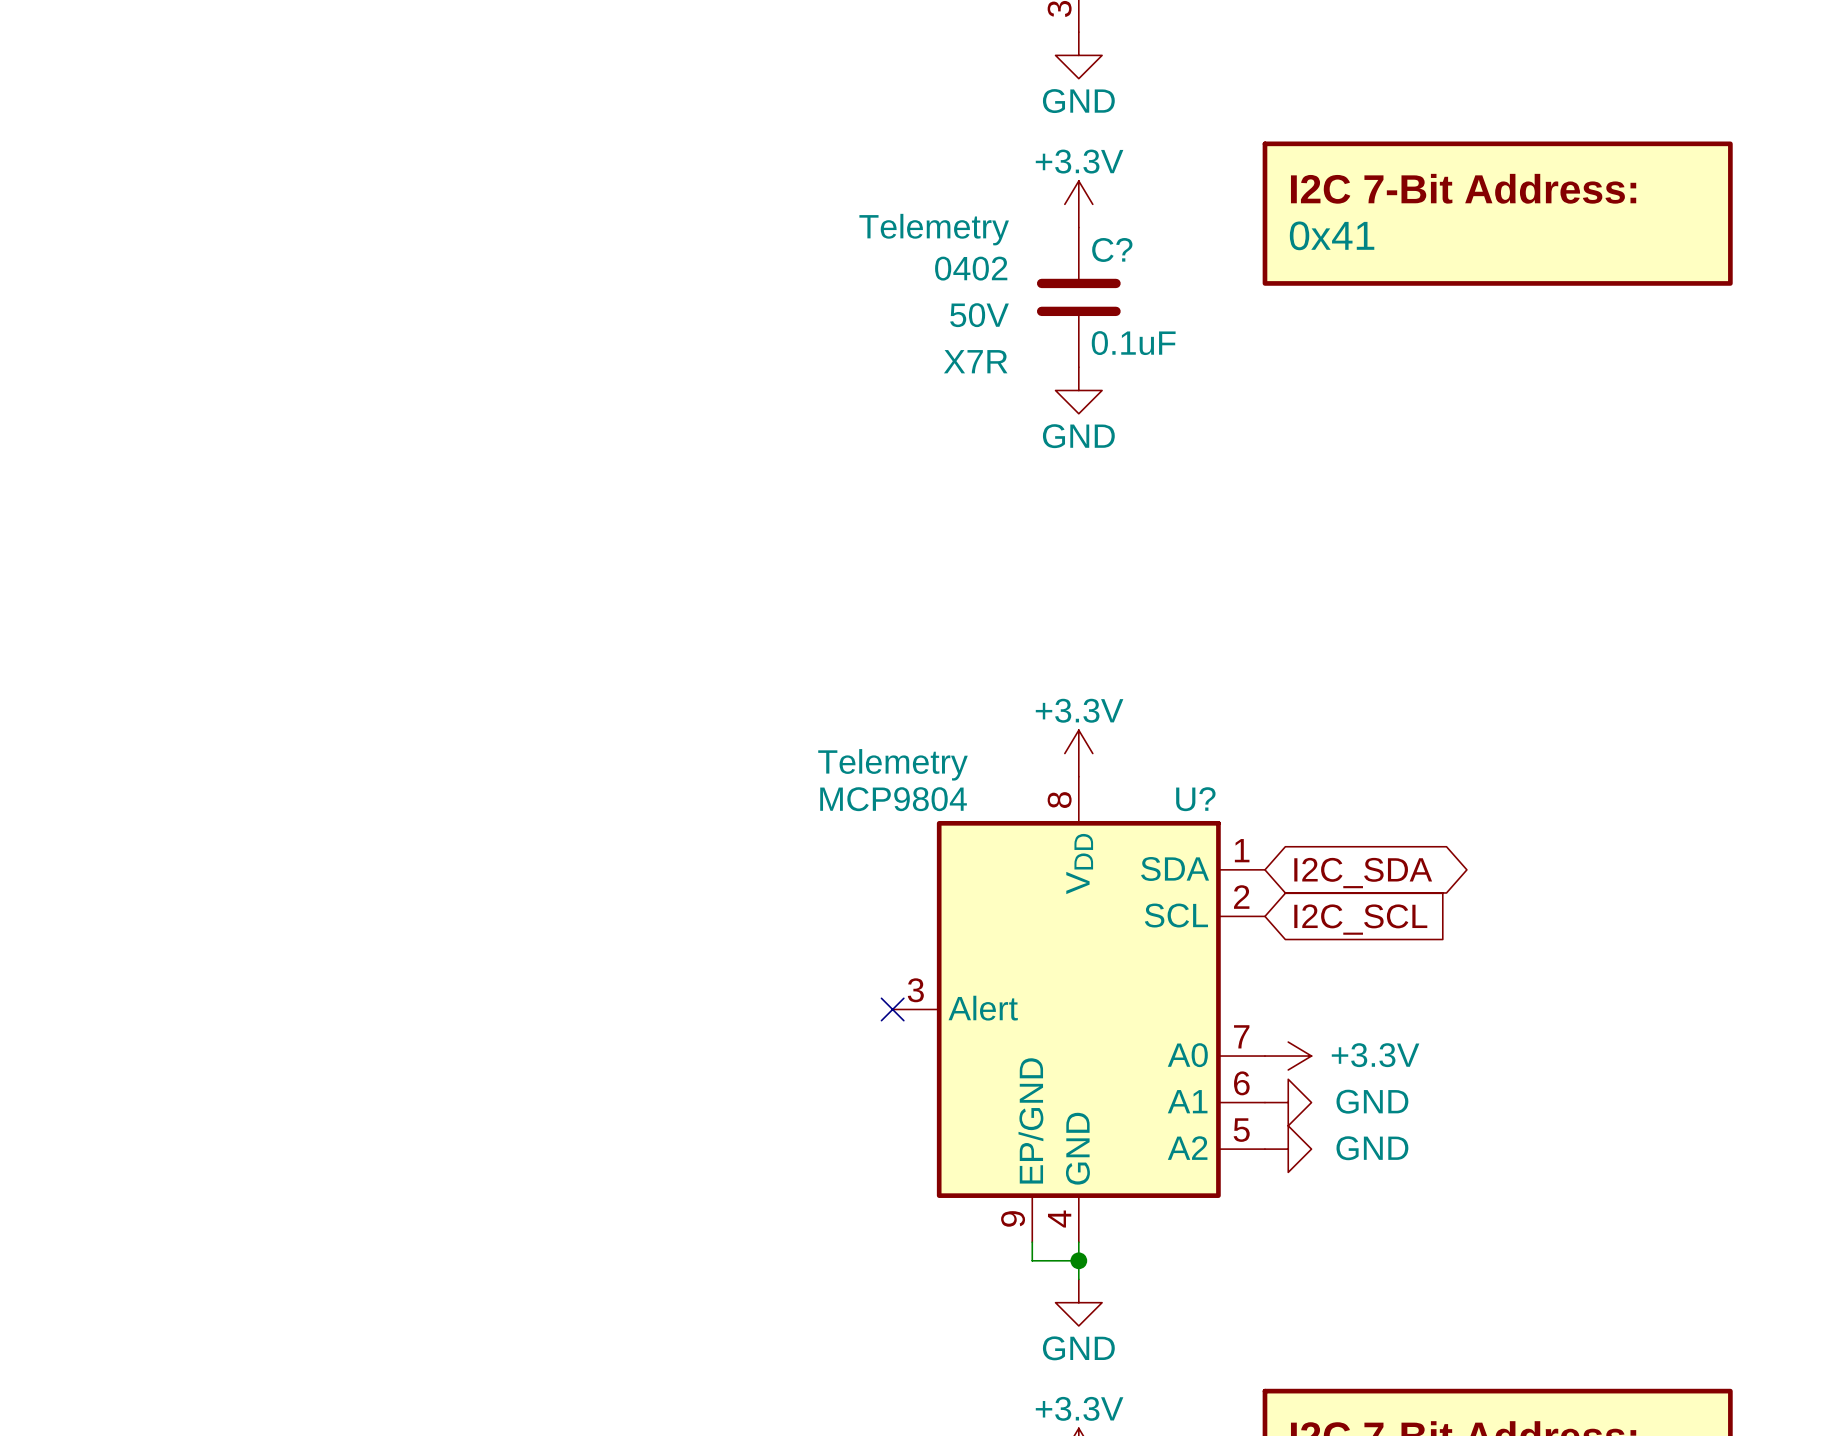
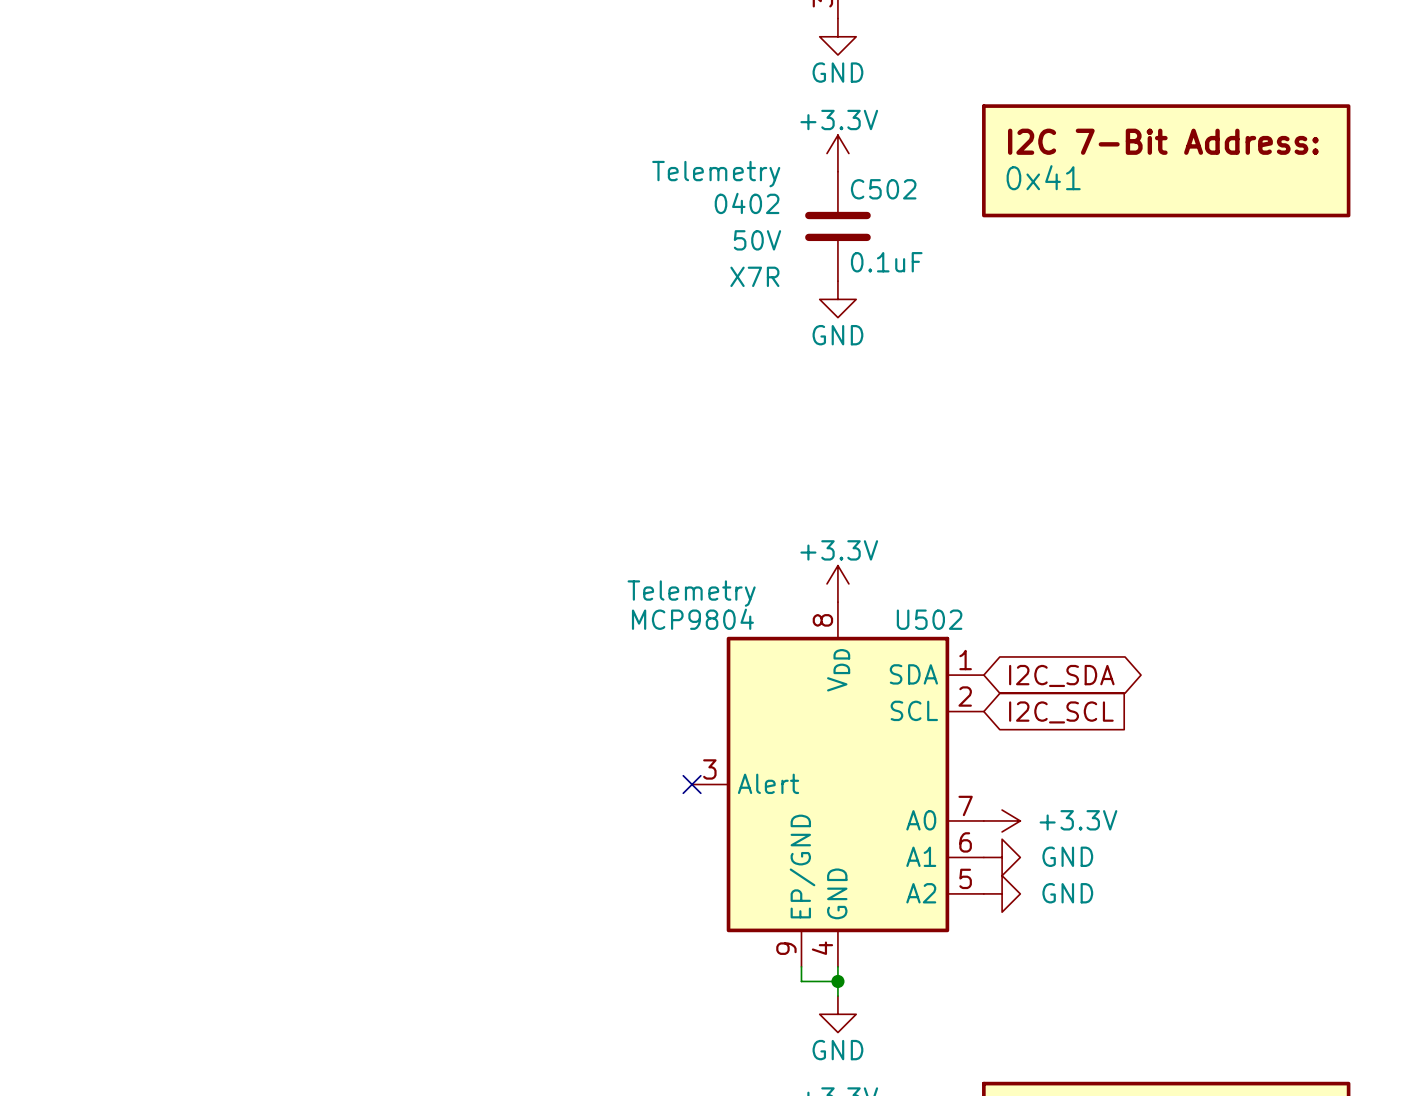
C? name: C? (1112, 249) -> C502 (883, 189)
U? name: U? (1195, 799) -> U502 (929, 619)

